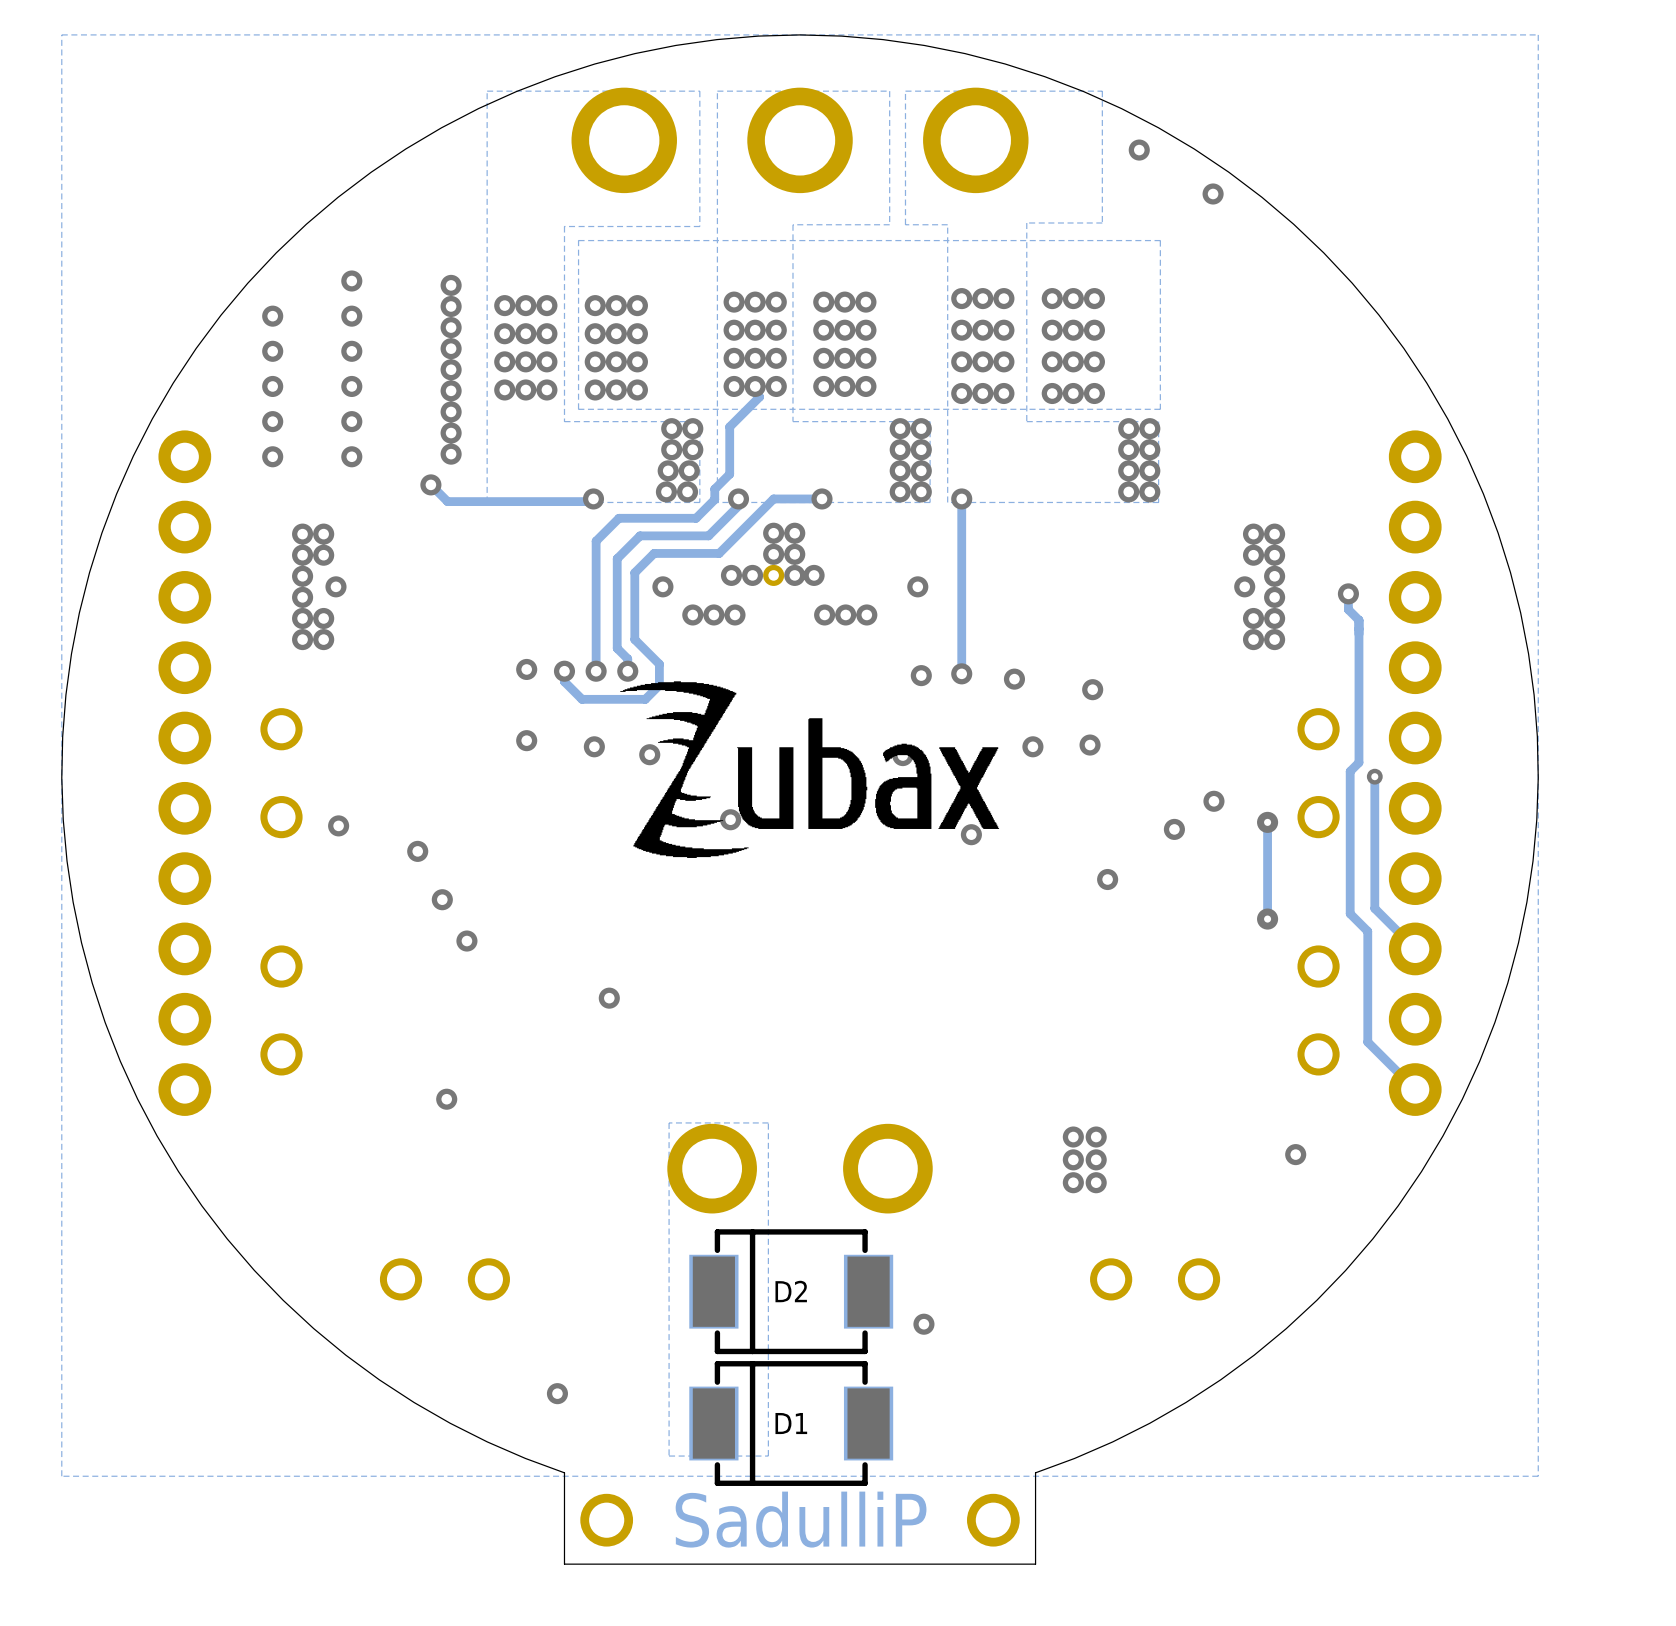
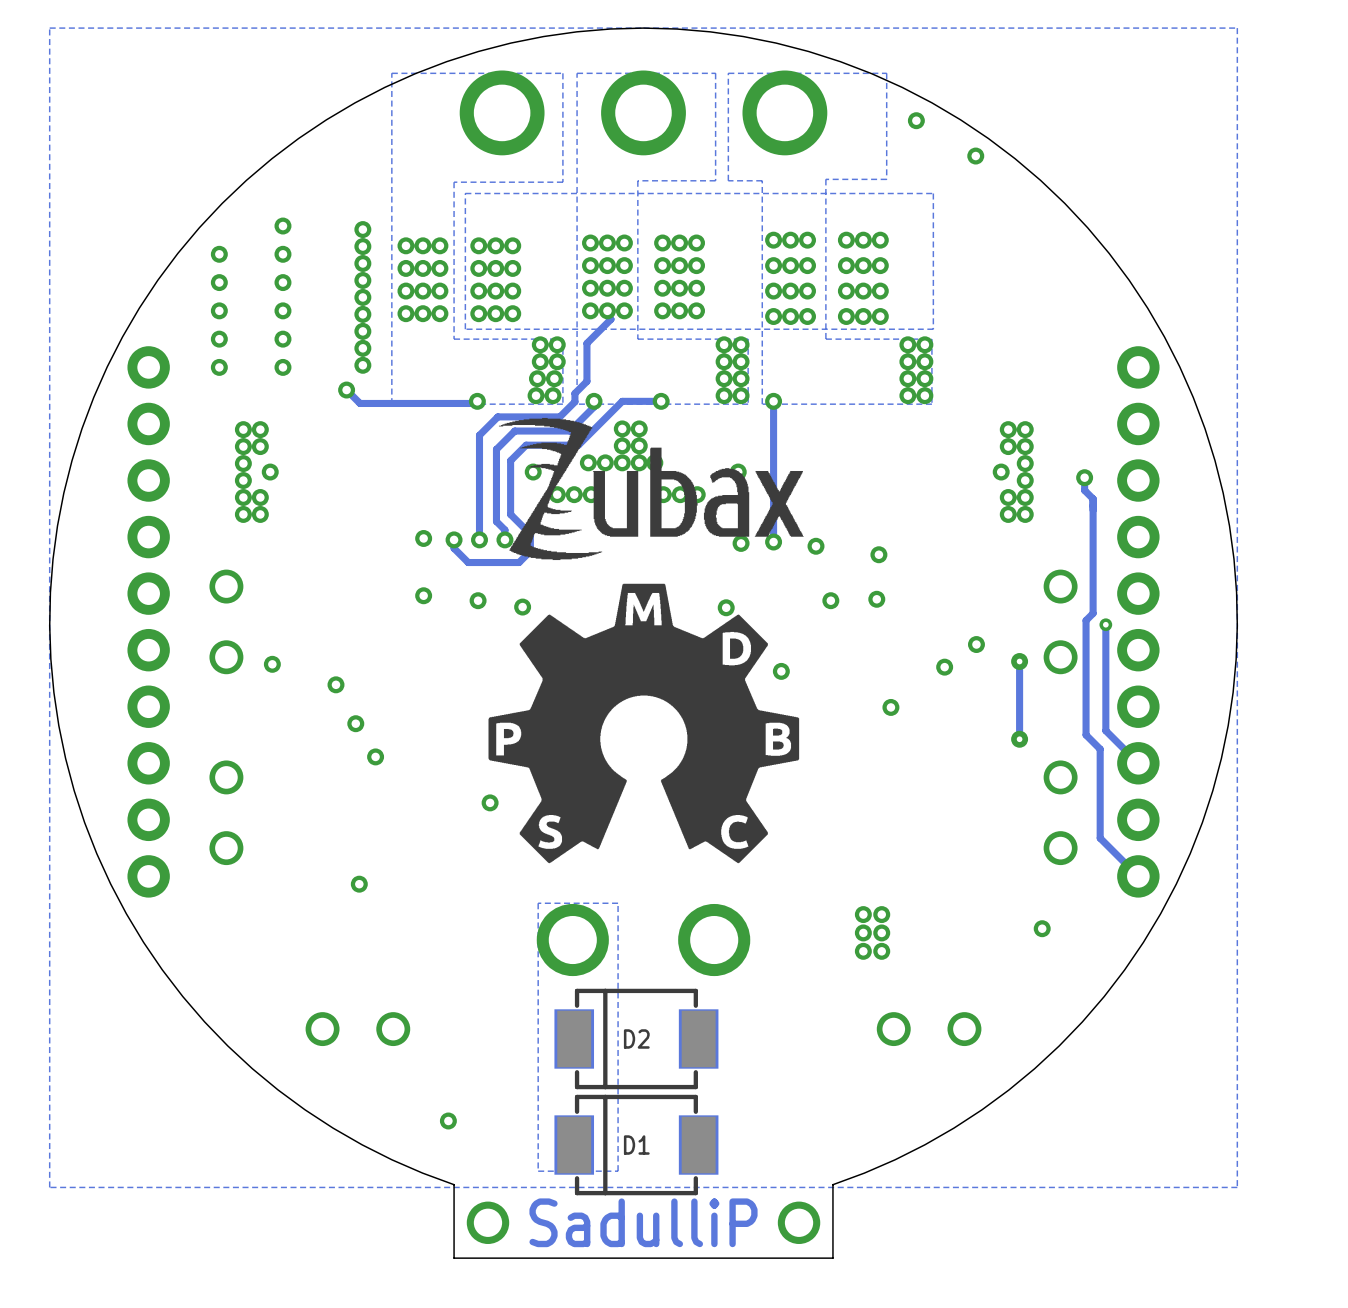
drawing: none -> [488, 583, 800, 864]
drawing position: (809, 769) -> (651, 489)
via: (923, 1324) -> none

